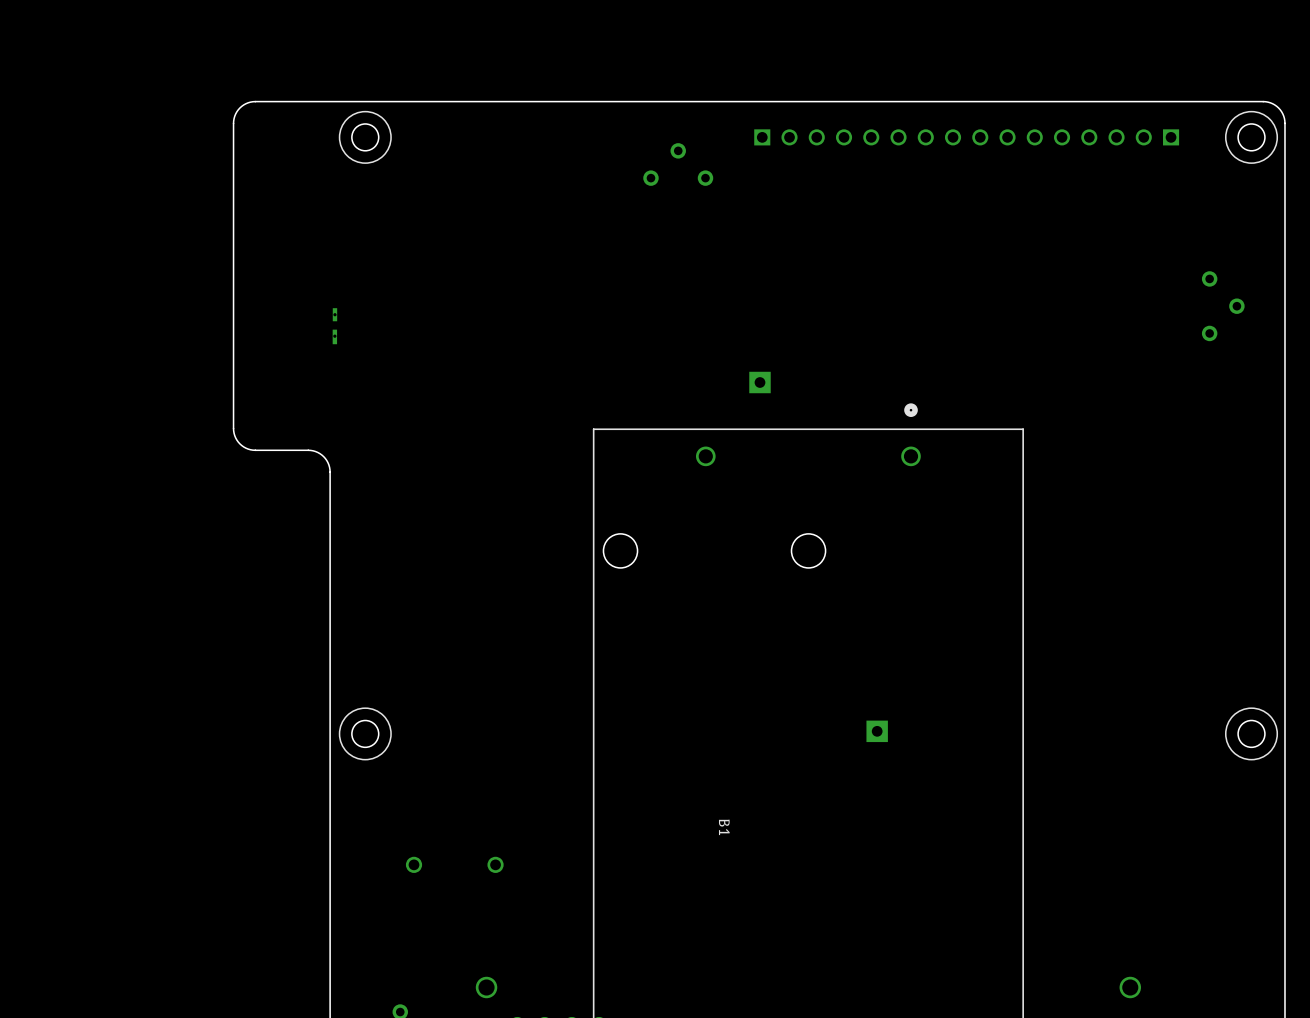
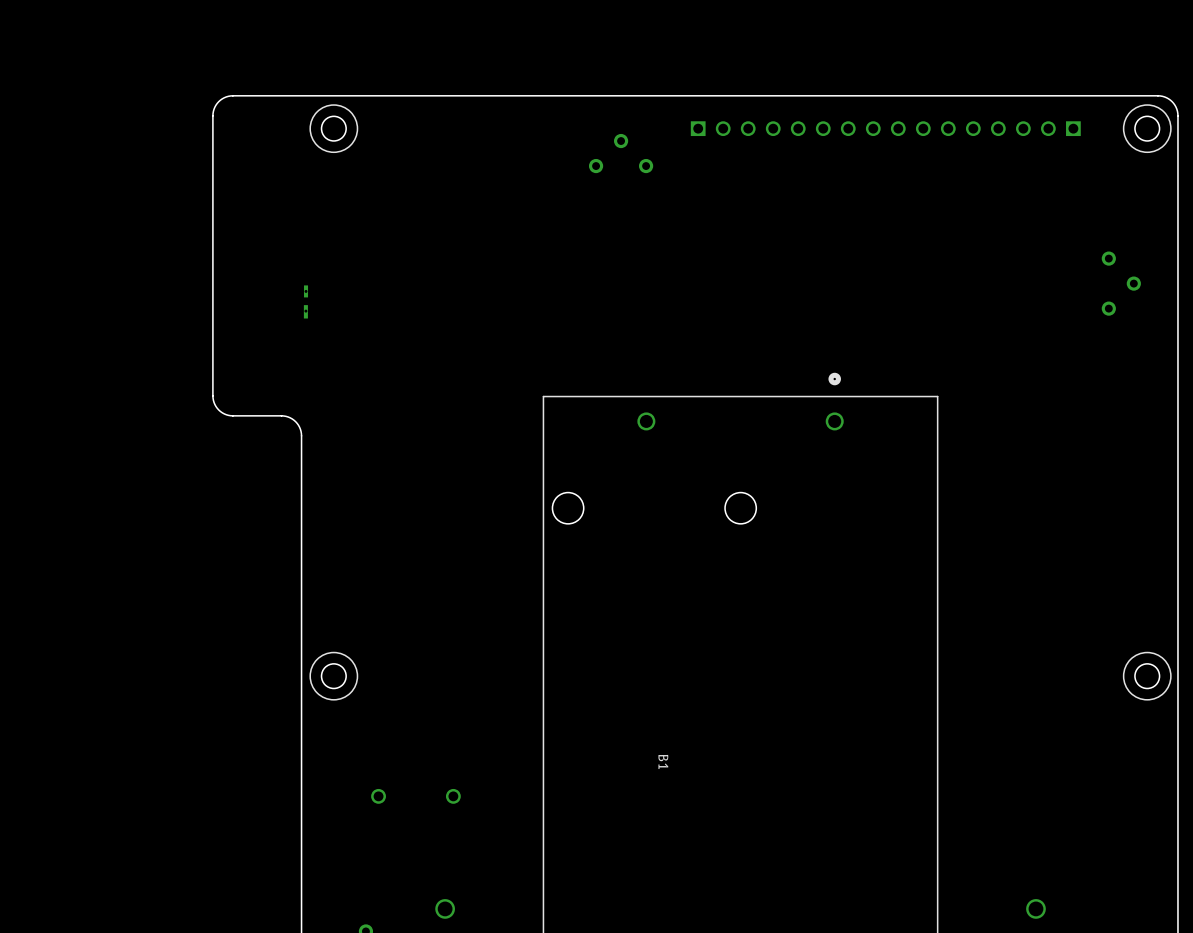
part: (759, 382) -> none
part: (877, 731) -> none

